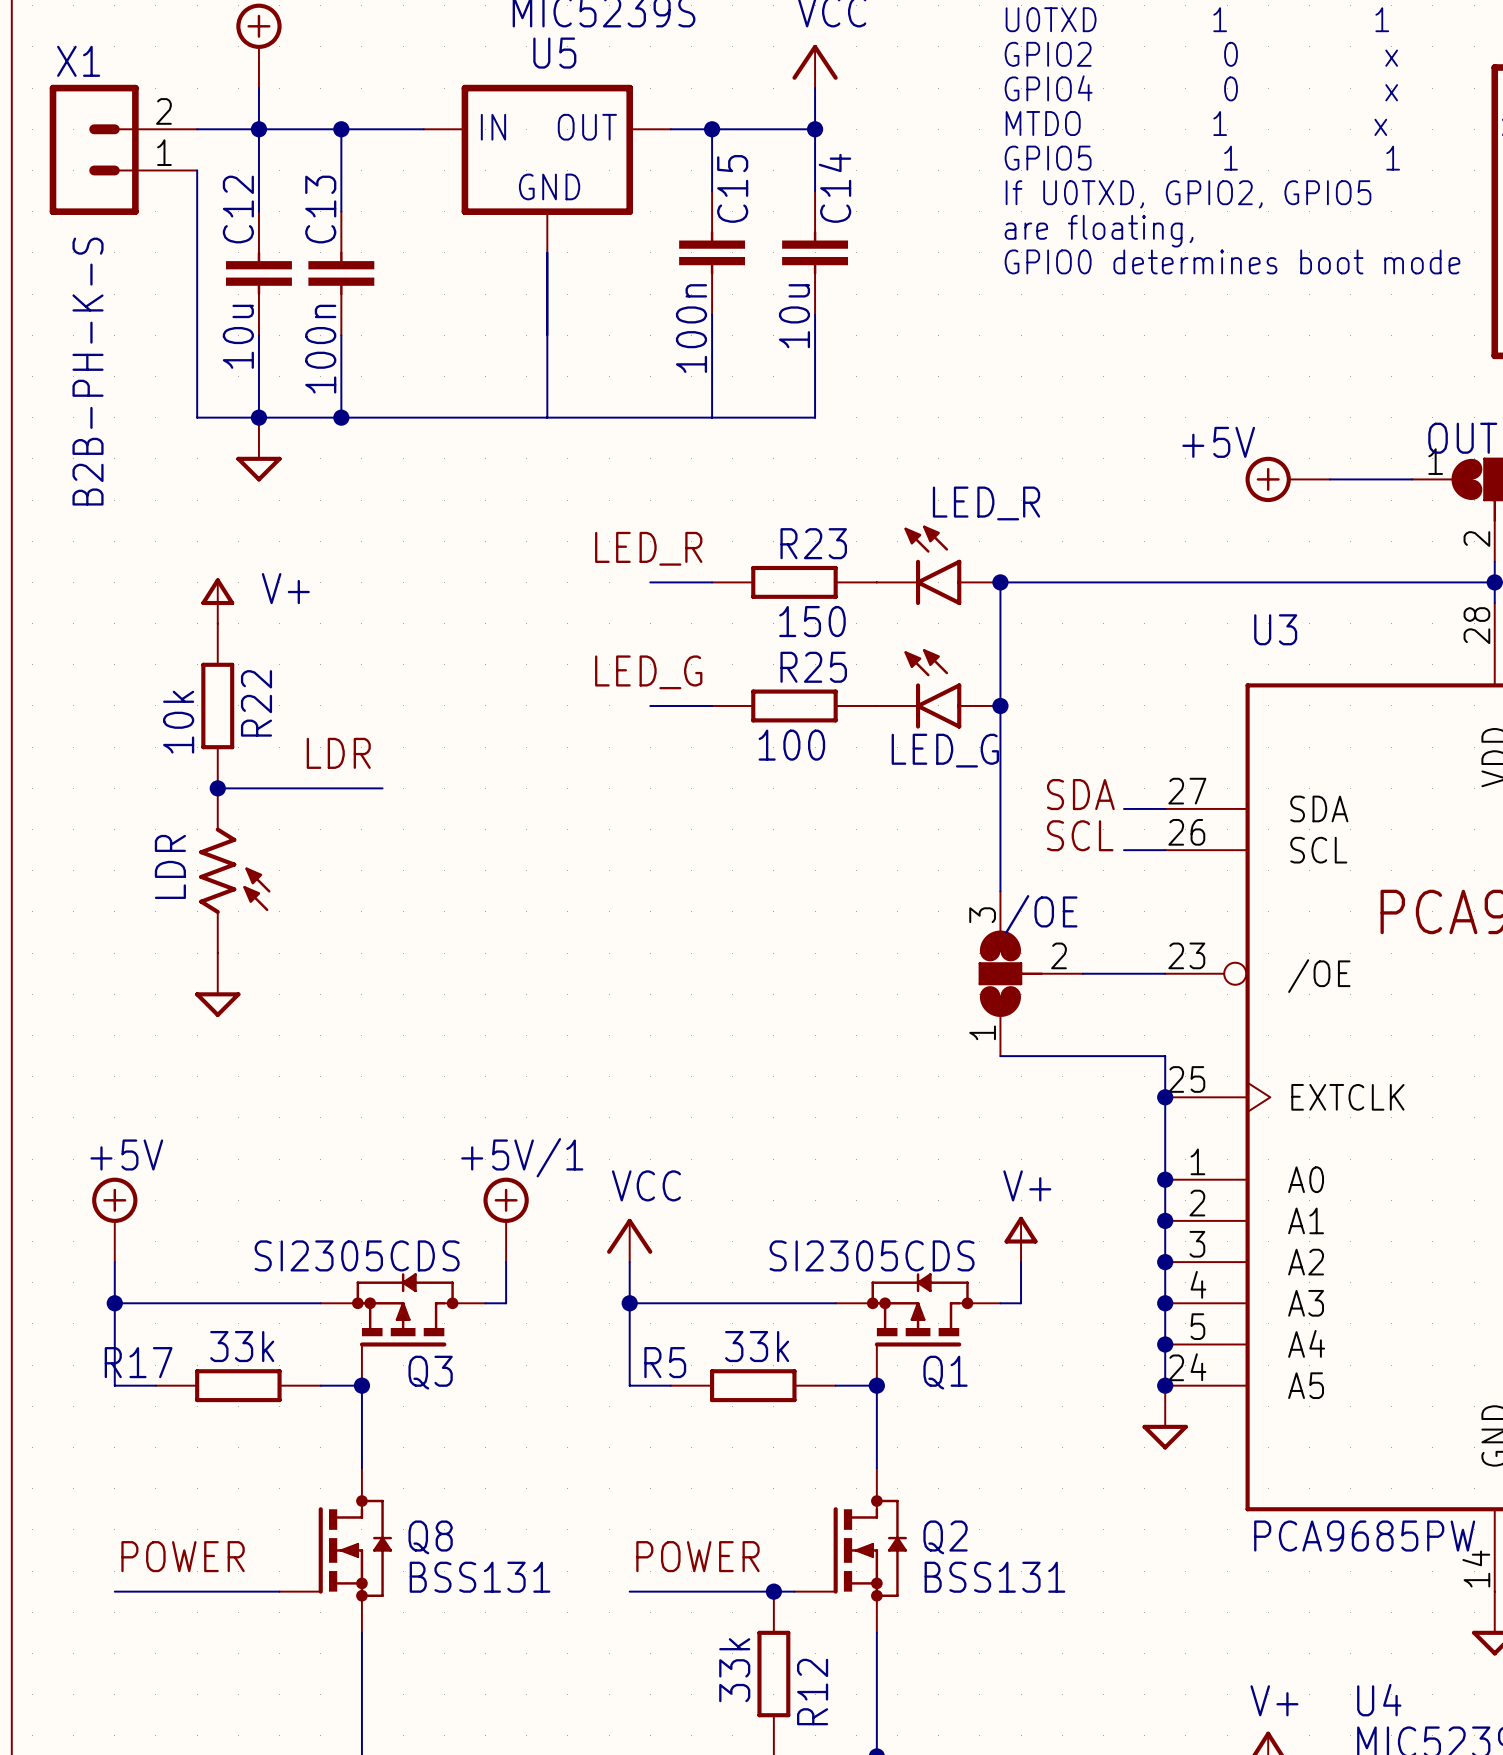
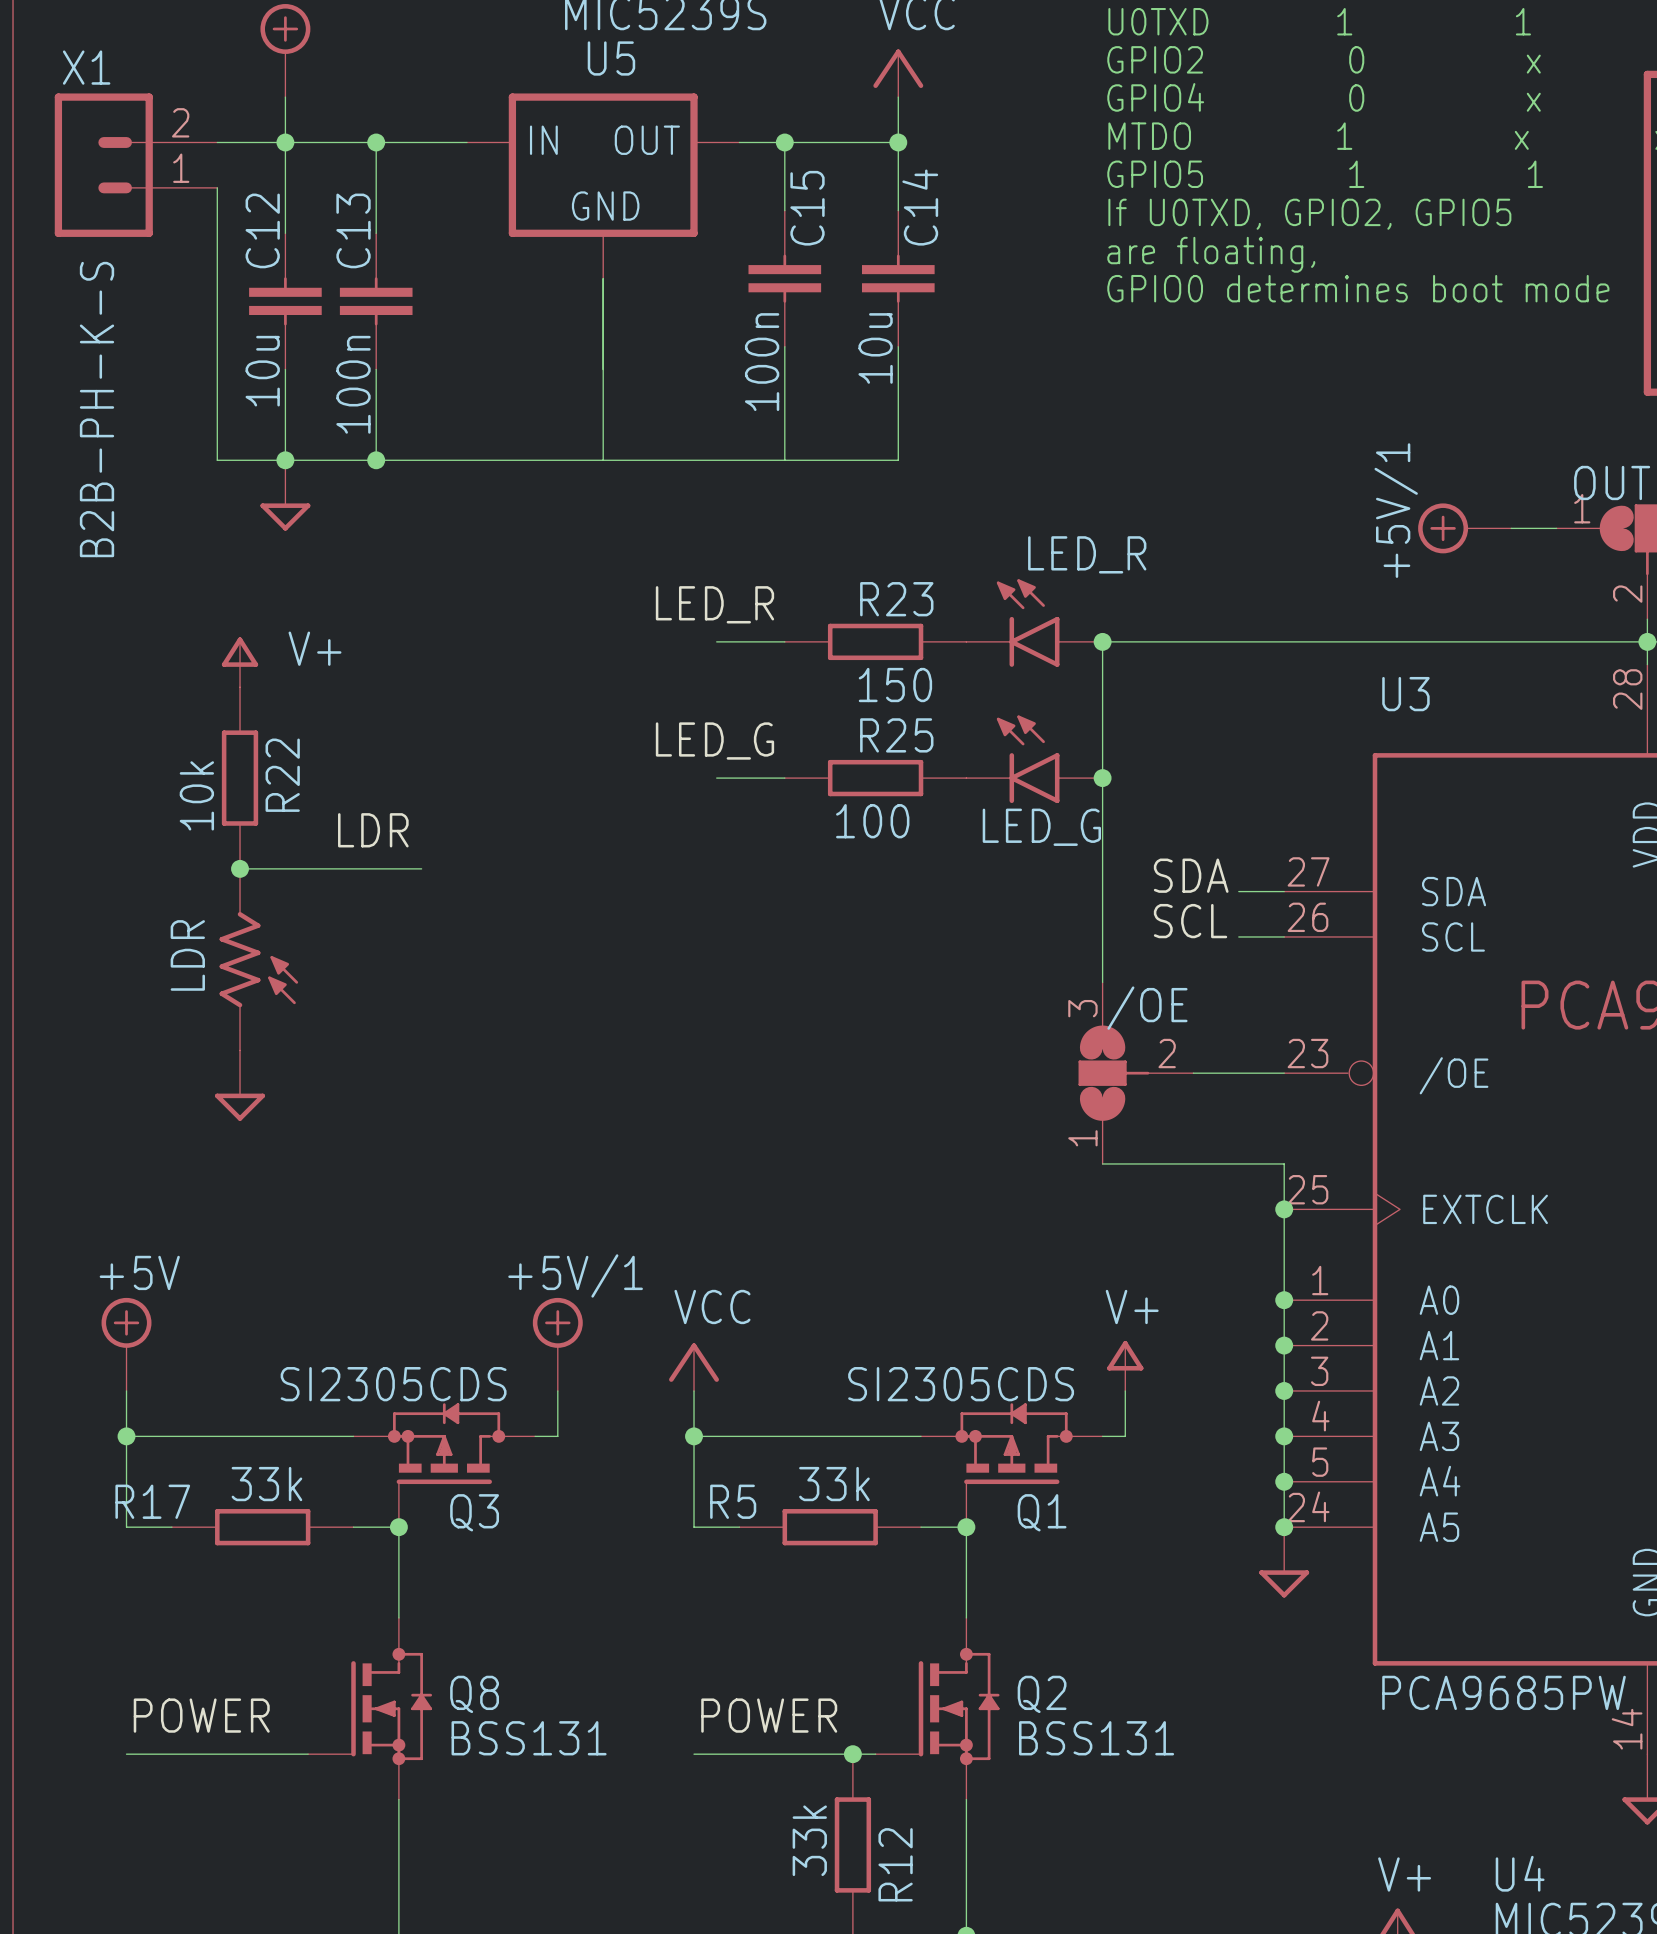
power symbol: +5V (1287, 479) -> none
power symbol: none -> +5V/1 (1464, 528)

